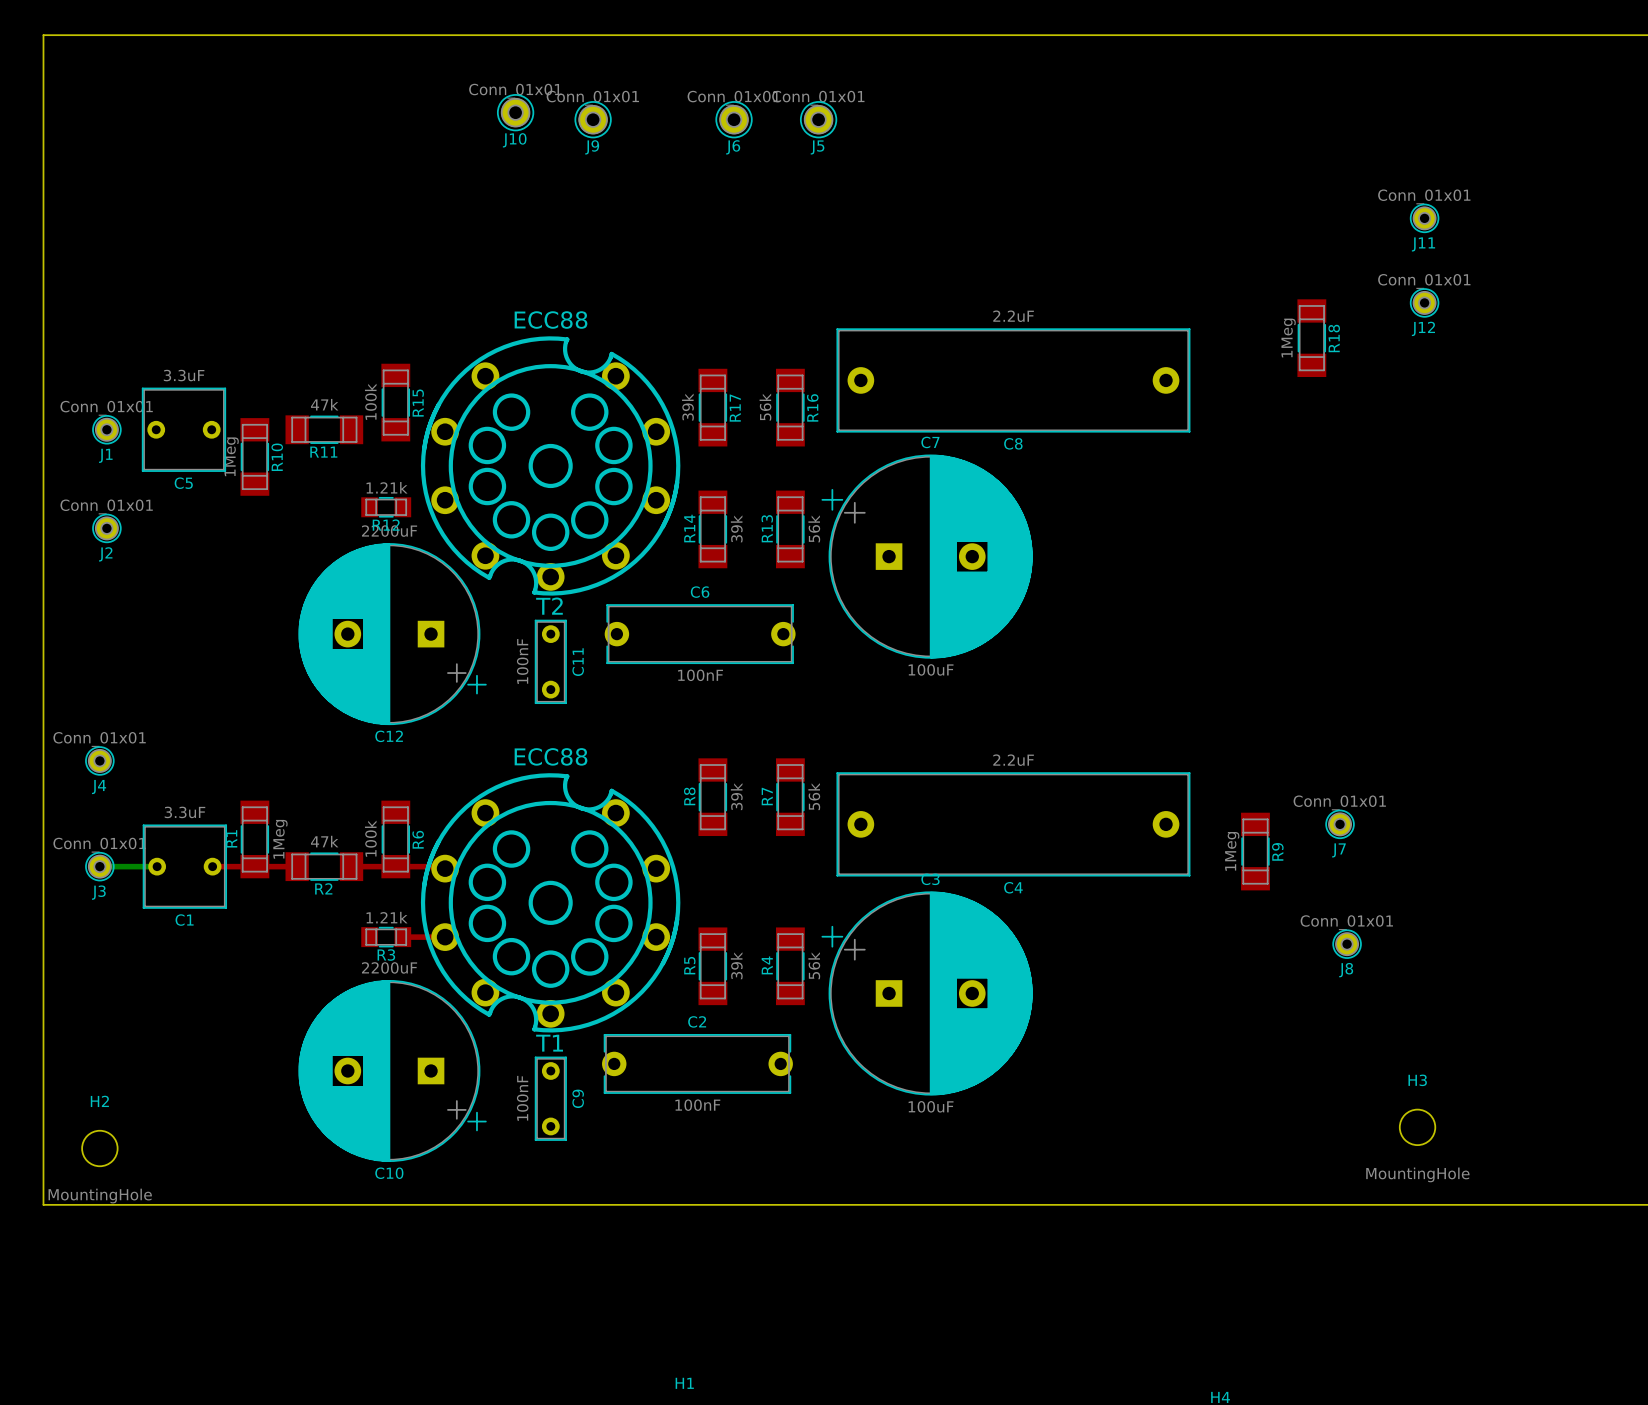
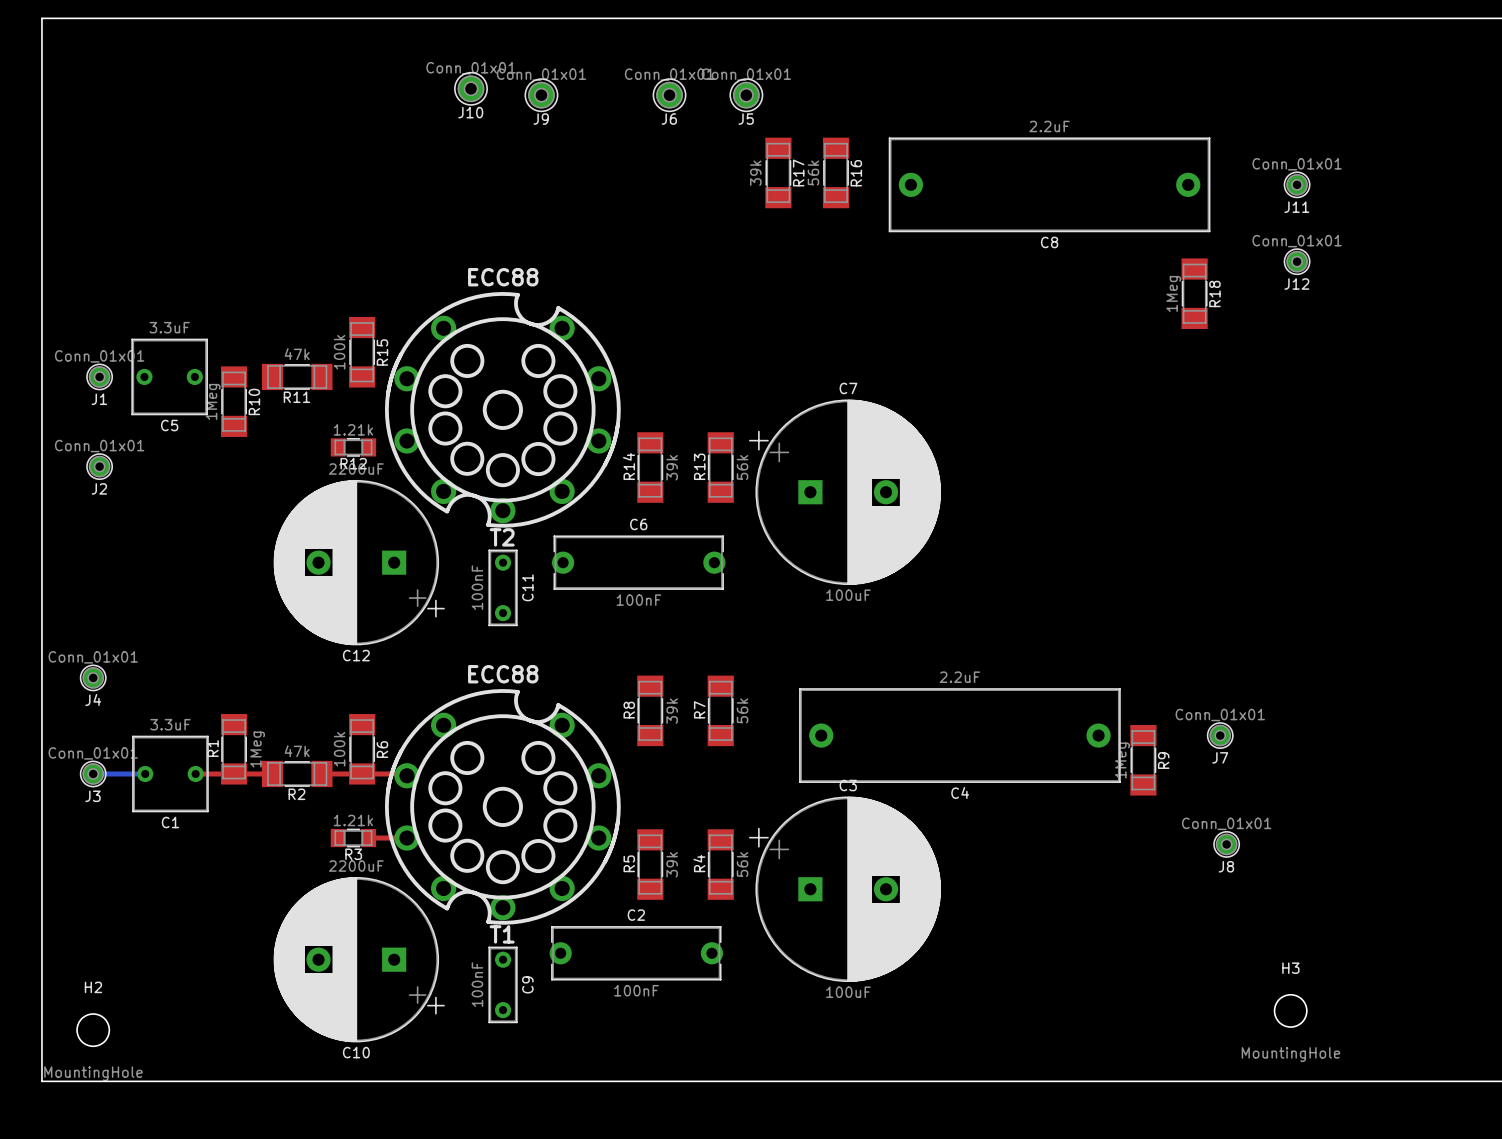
C8 position: (1013, 380) -> (1049, 184)
R17 position: (712, 407) -> (778, 172)
R16 position: (790, 407) -> (836, 172)
C4 position: (1013, 824) -> (959, 735)

